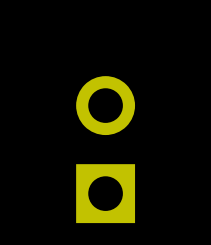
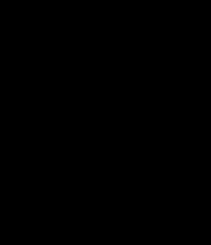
part: (105, 149) -> none

